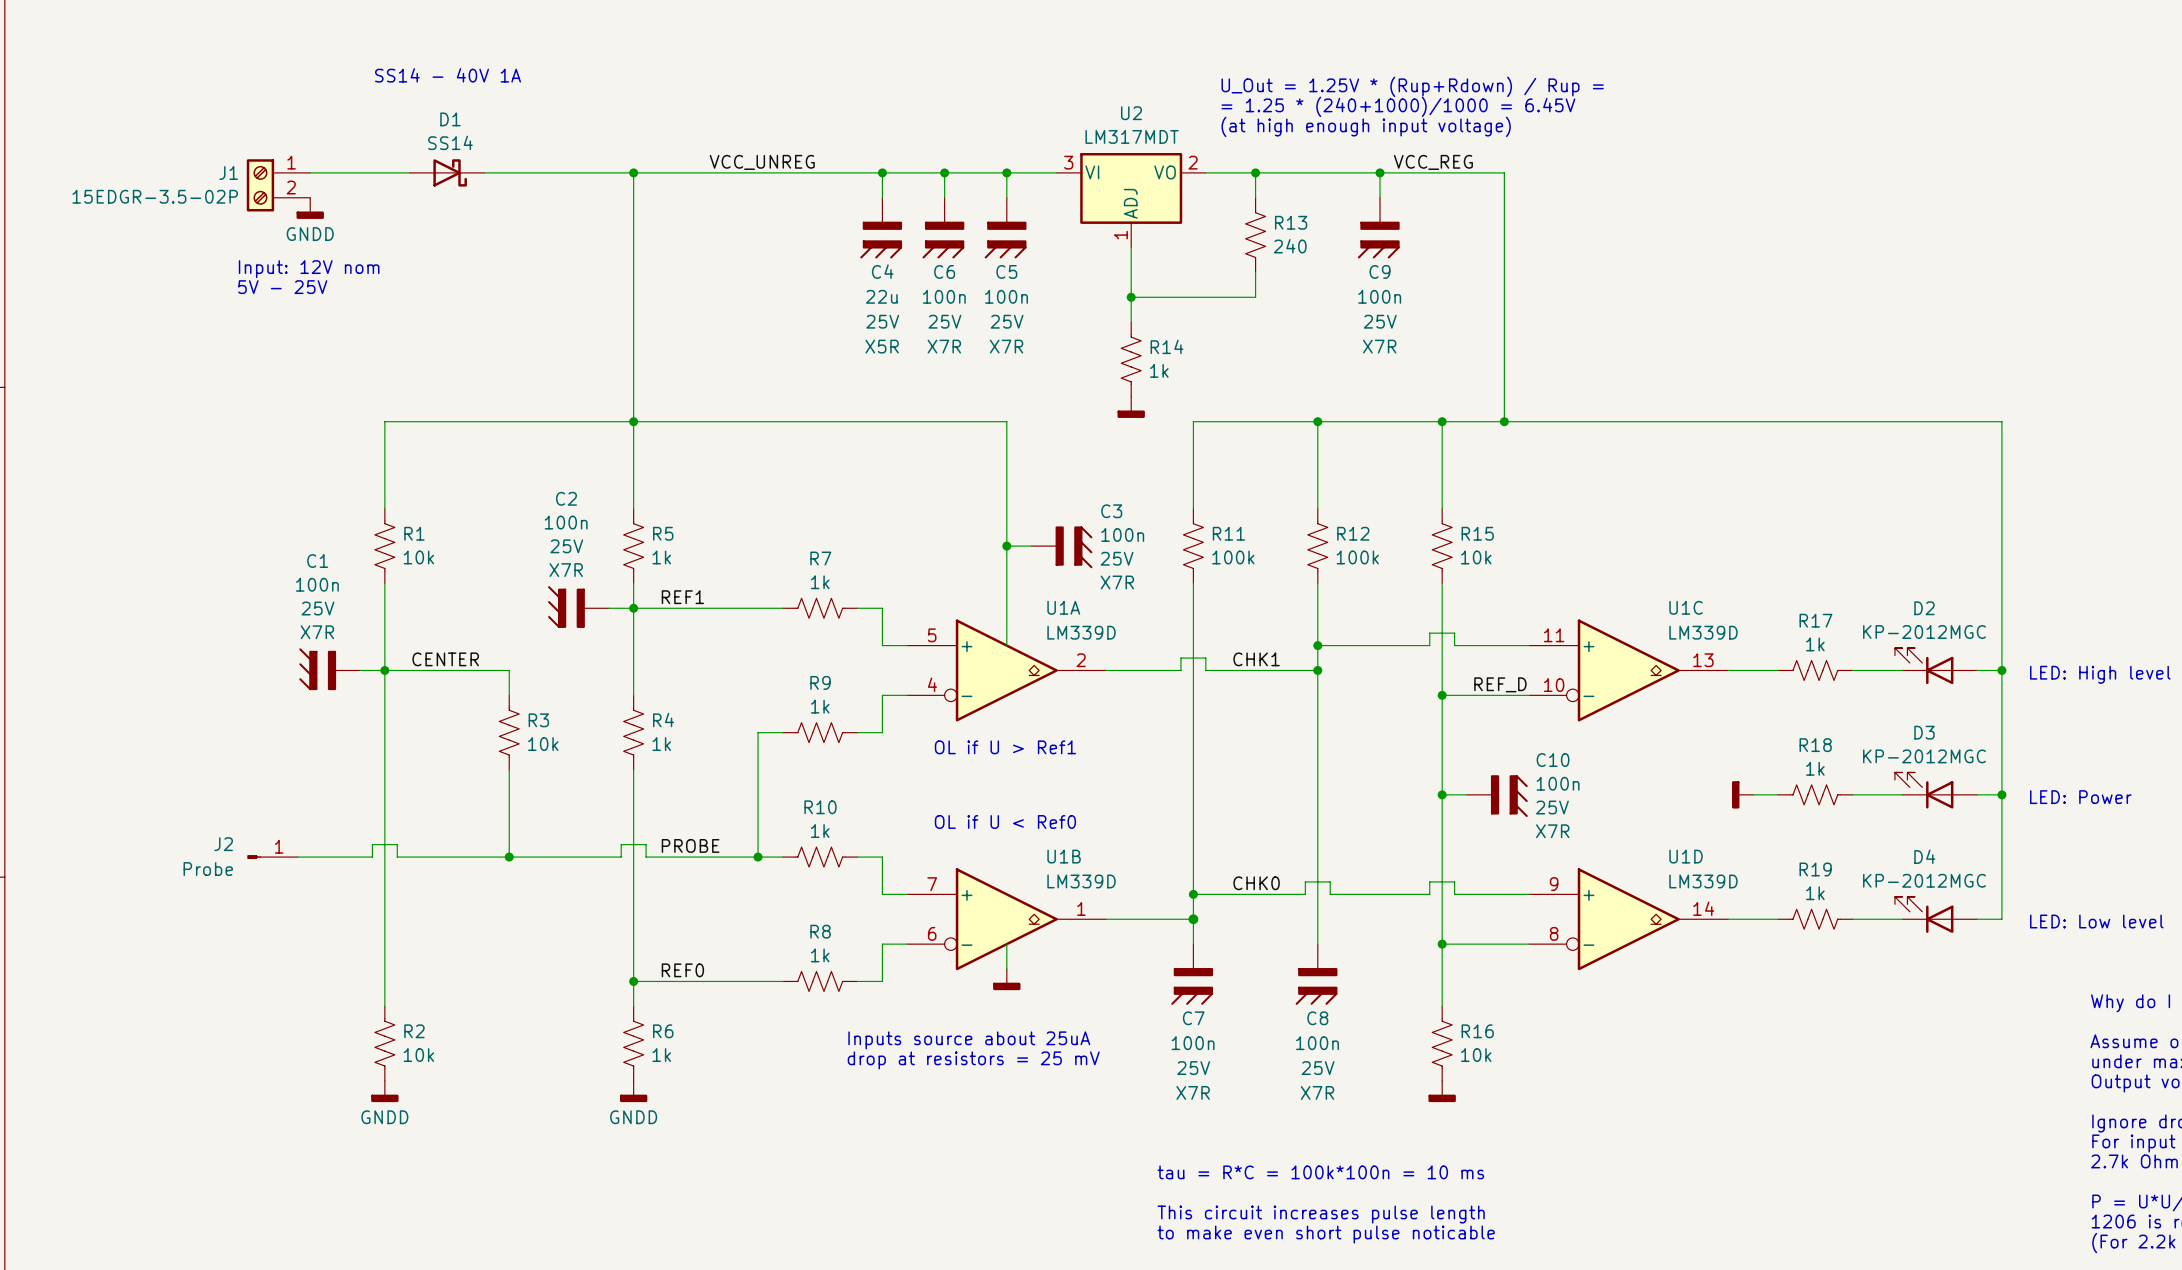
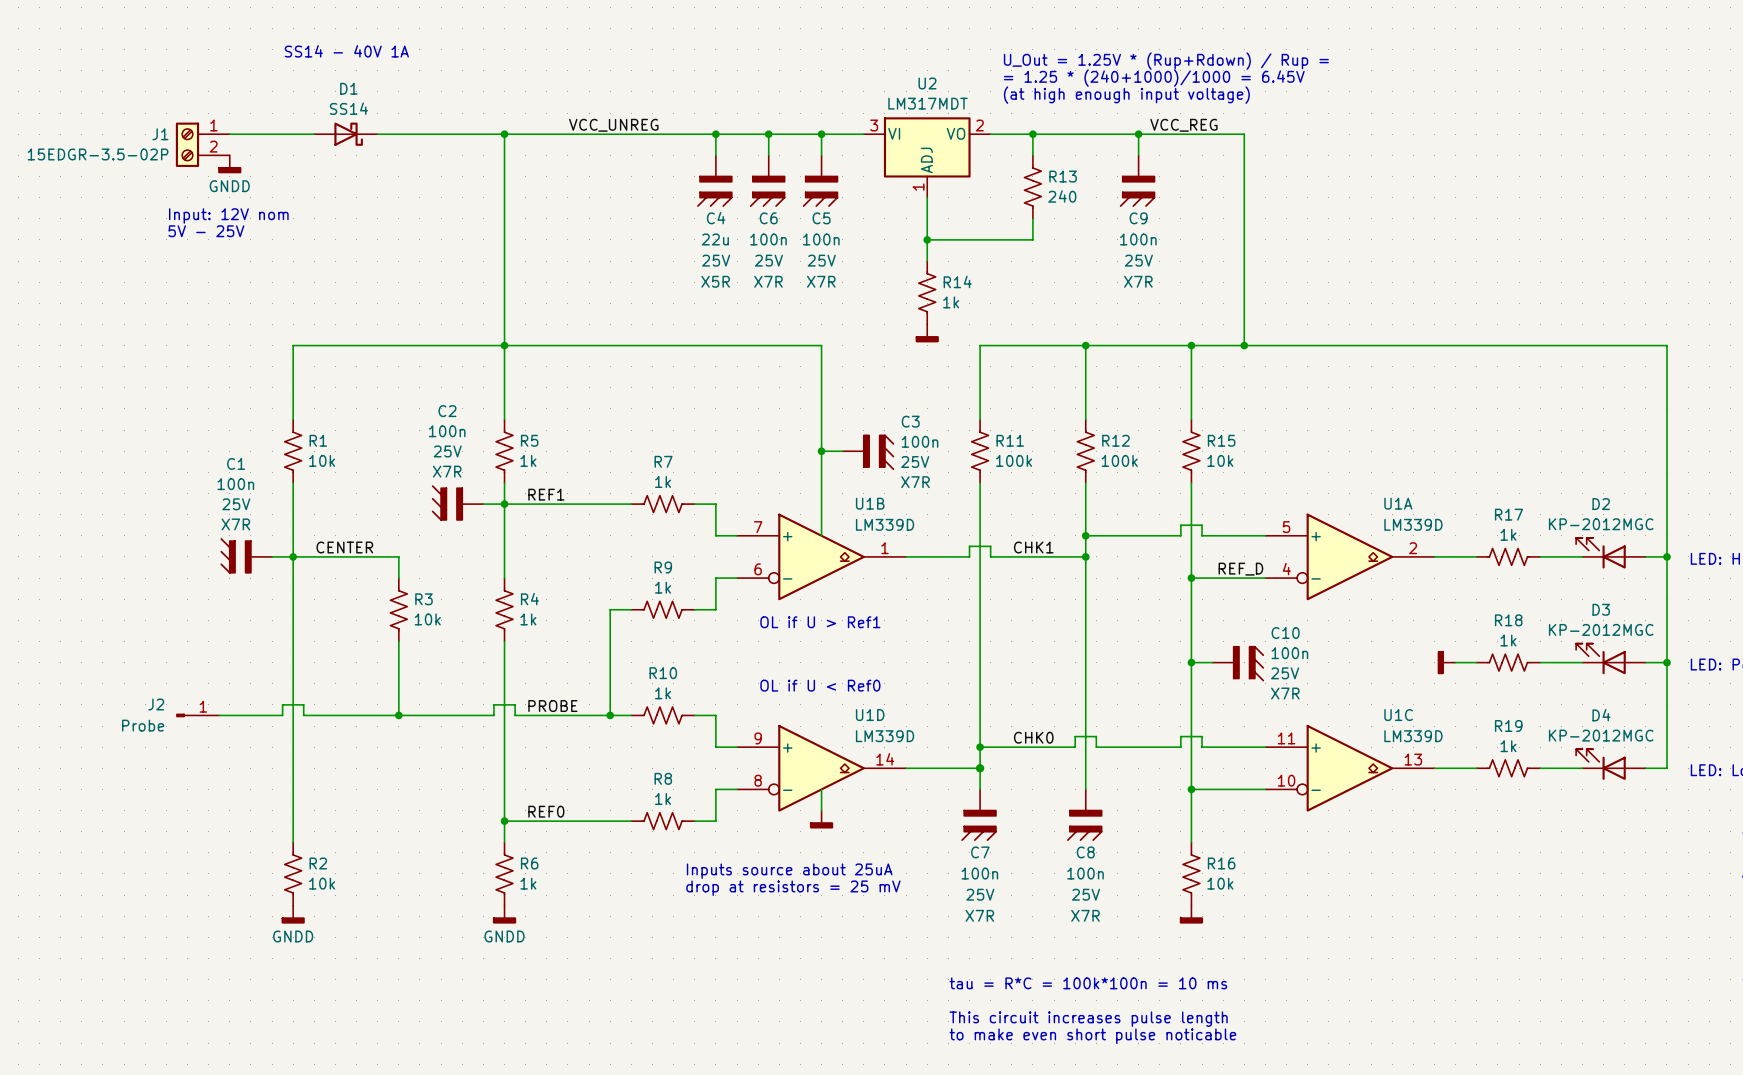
U1A position: (1006, 670) -> (1349, 556)
U1C position: (1628, 670) -> (1349, 768)
U1B position: (1006, 919) -> (821, 556)
U1D position: (1628, 919) -> (821, 768)

